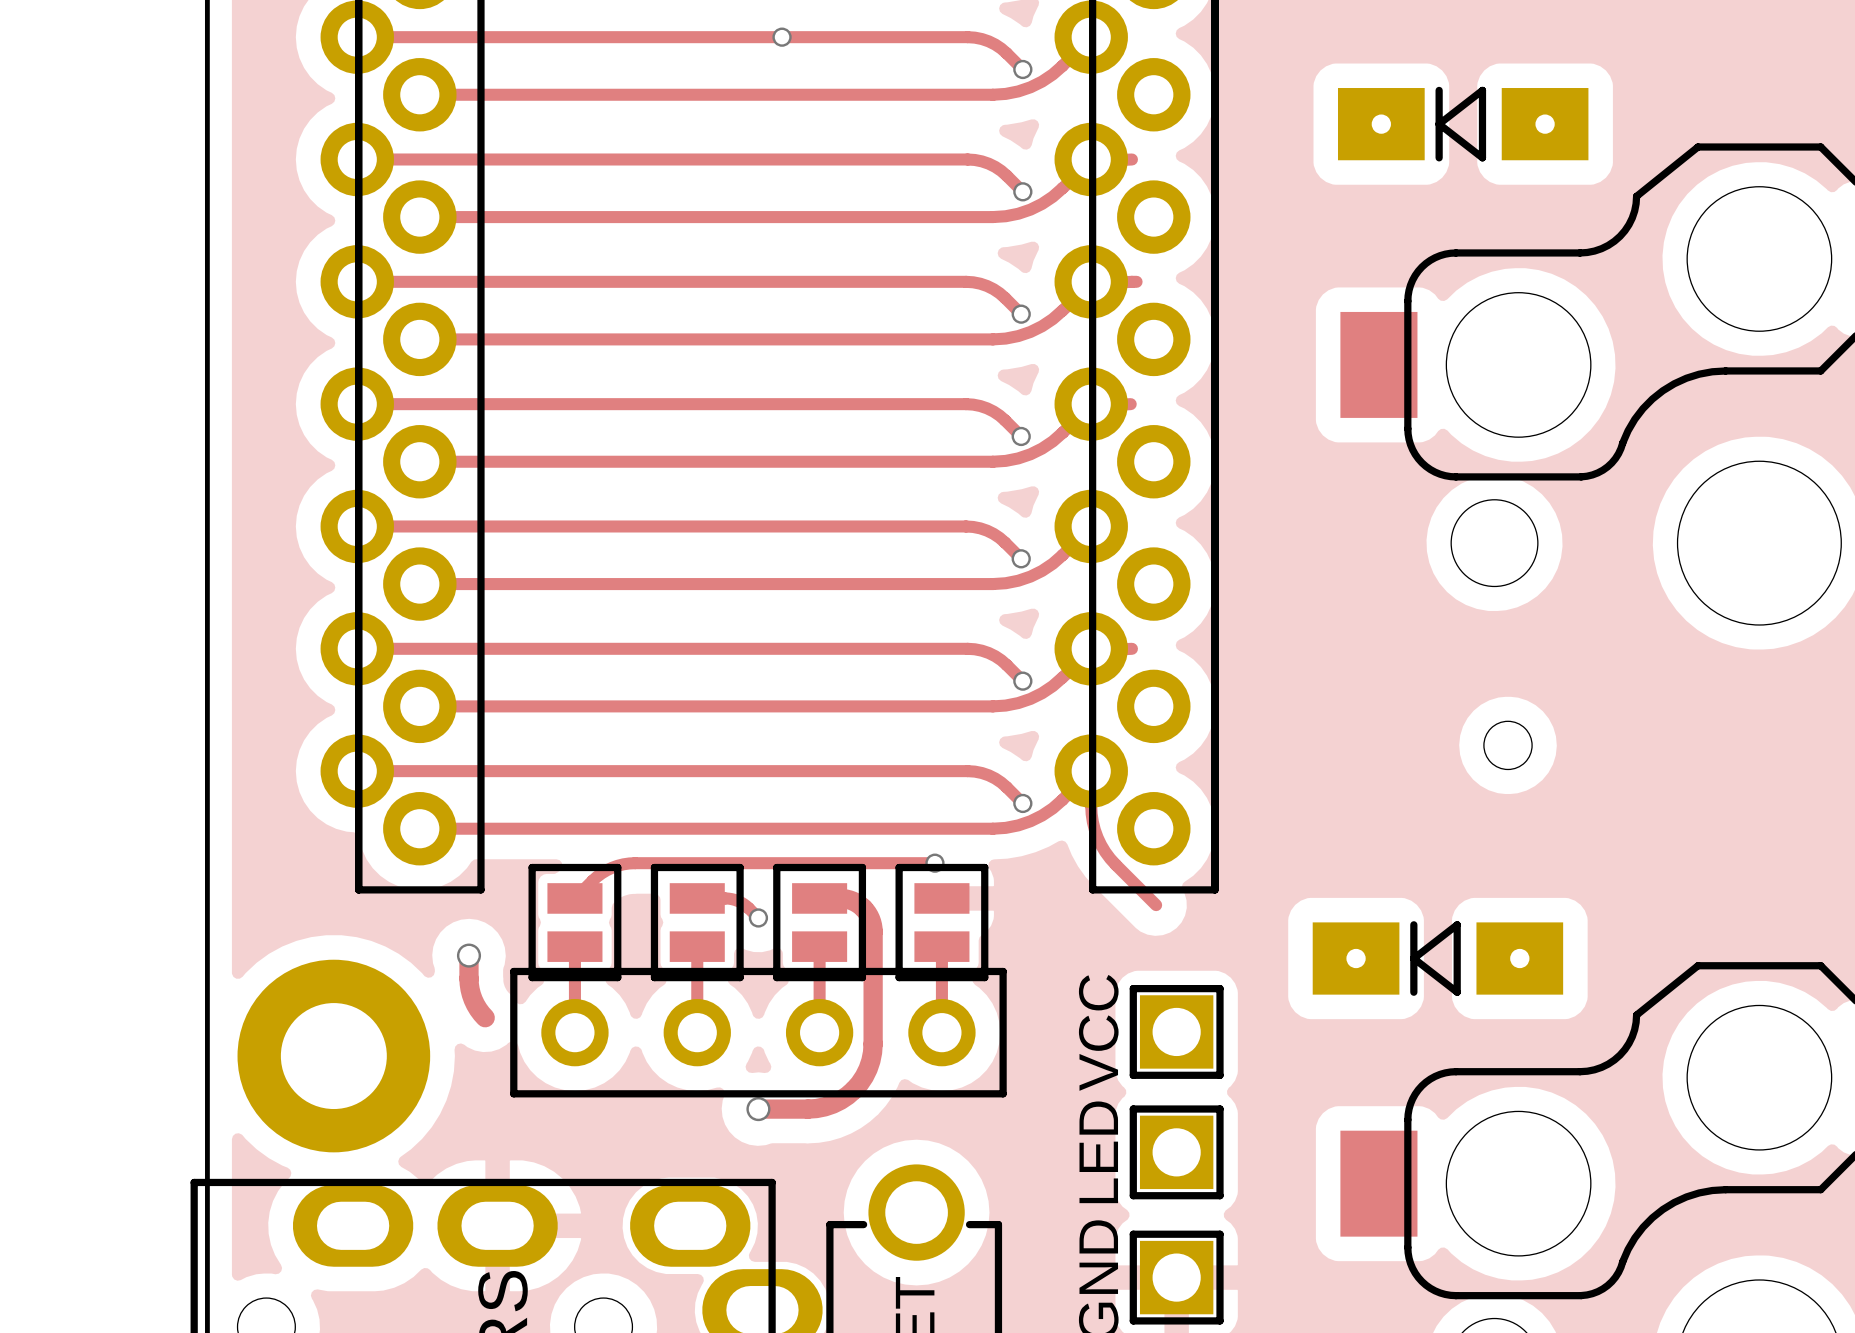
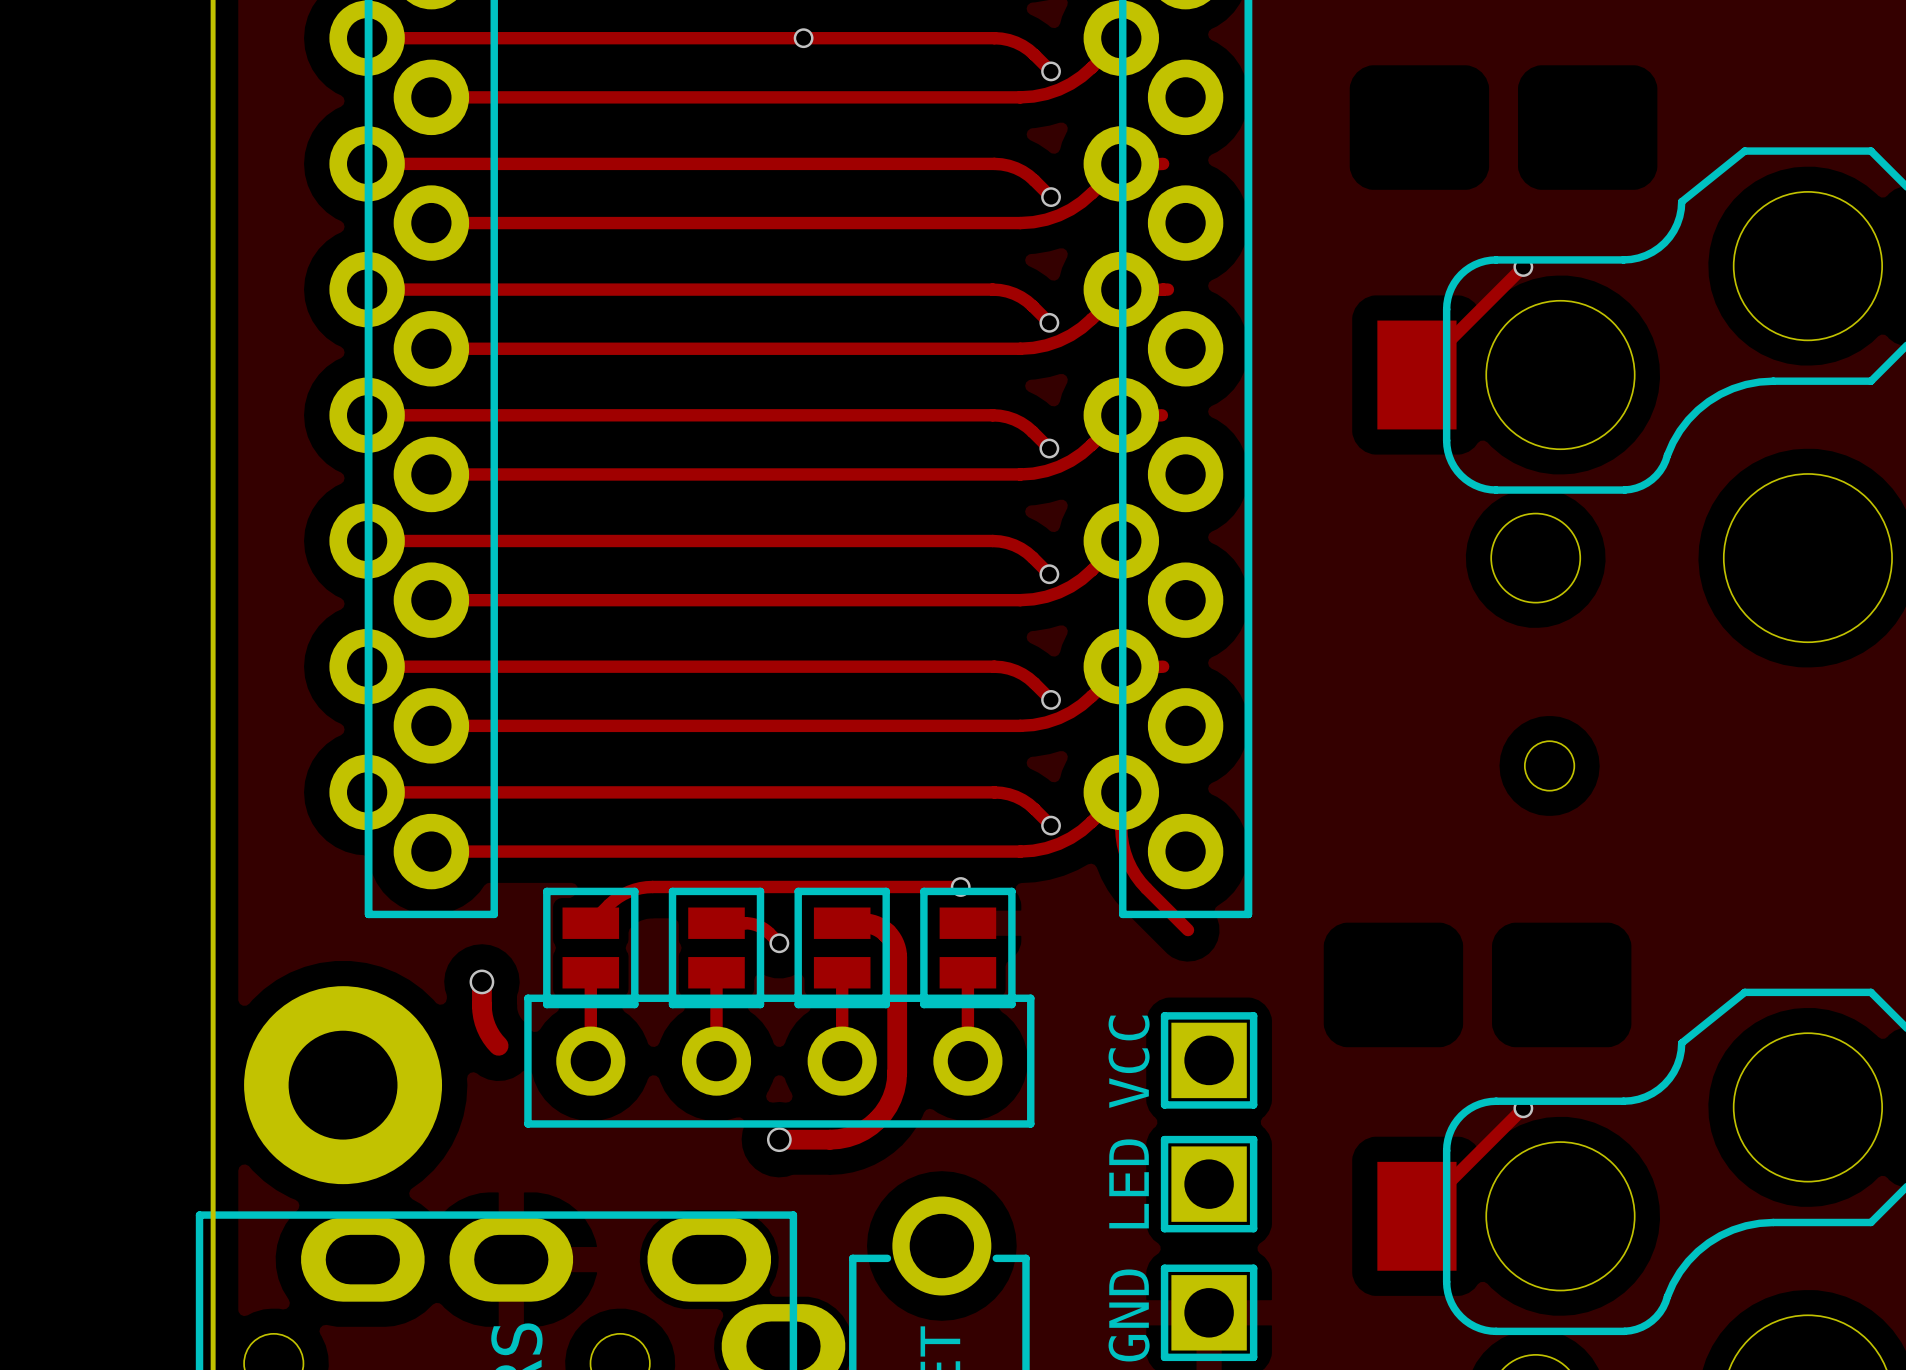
part: (1463, 124) -> none
track: none -> (1523, 267) (1416, 374)
via: none -> (1523, 267)
part: (1437, 958) -> none
track: none -> (1523, 1108) (1416, 1216)
via: none -> (1523, 1108)

